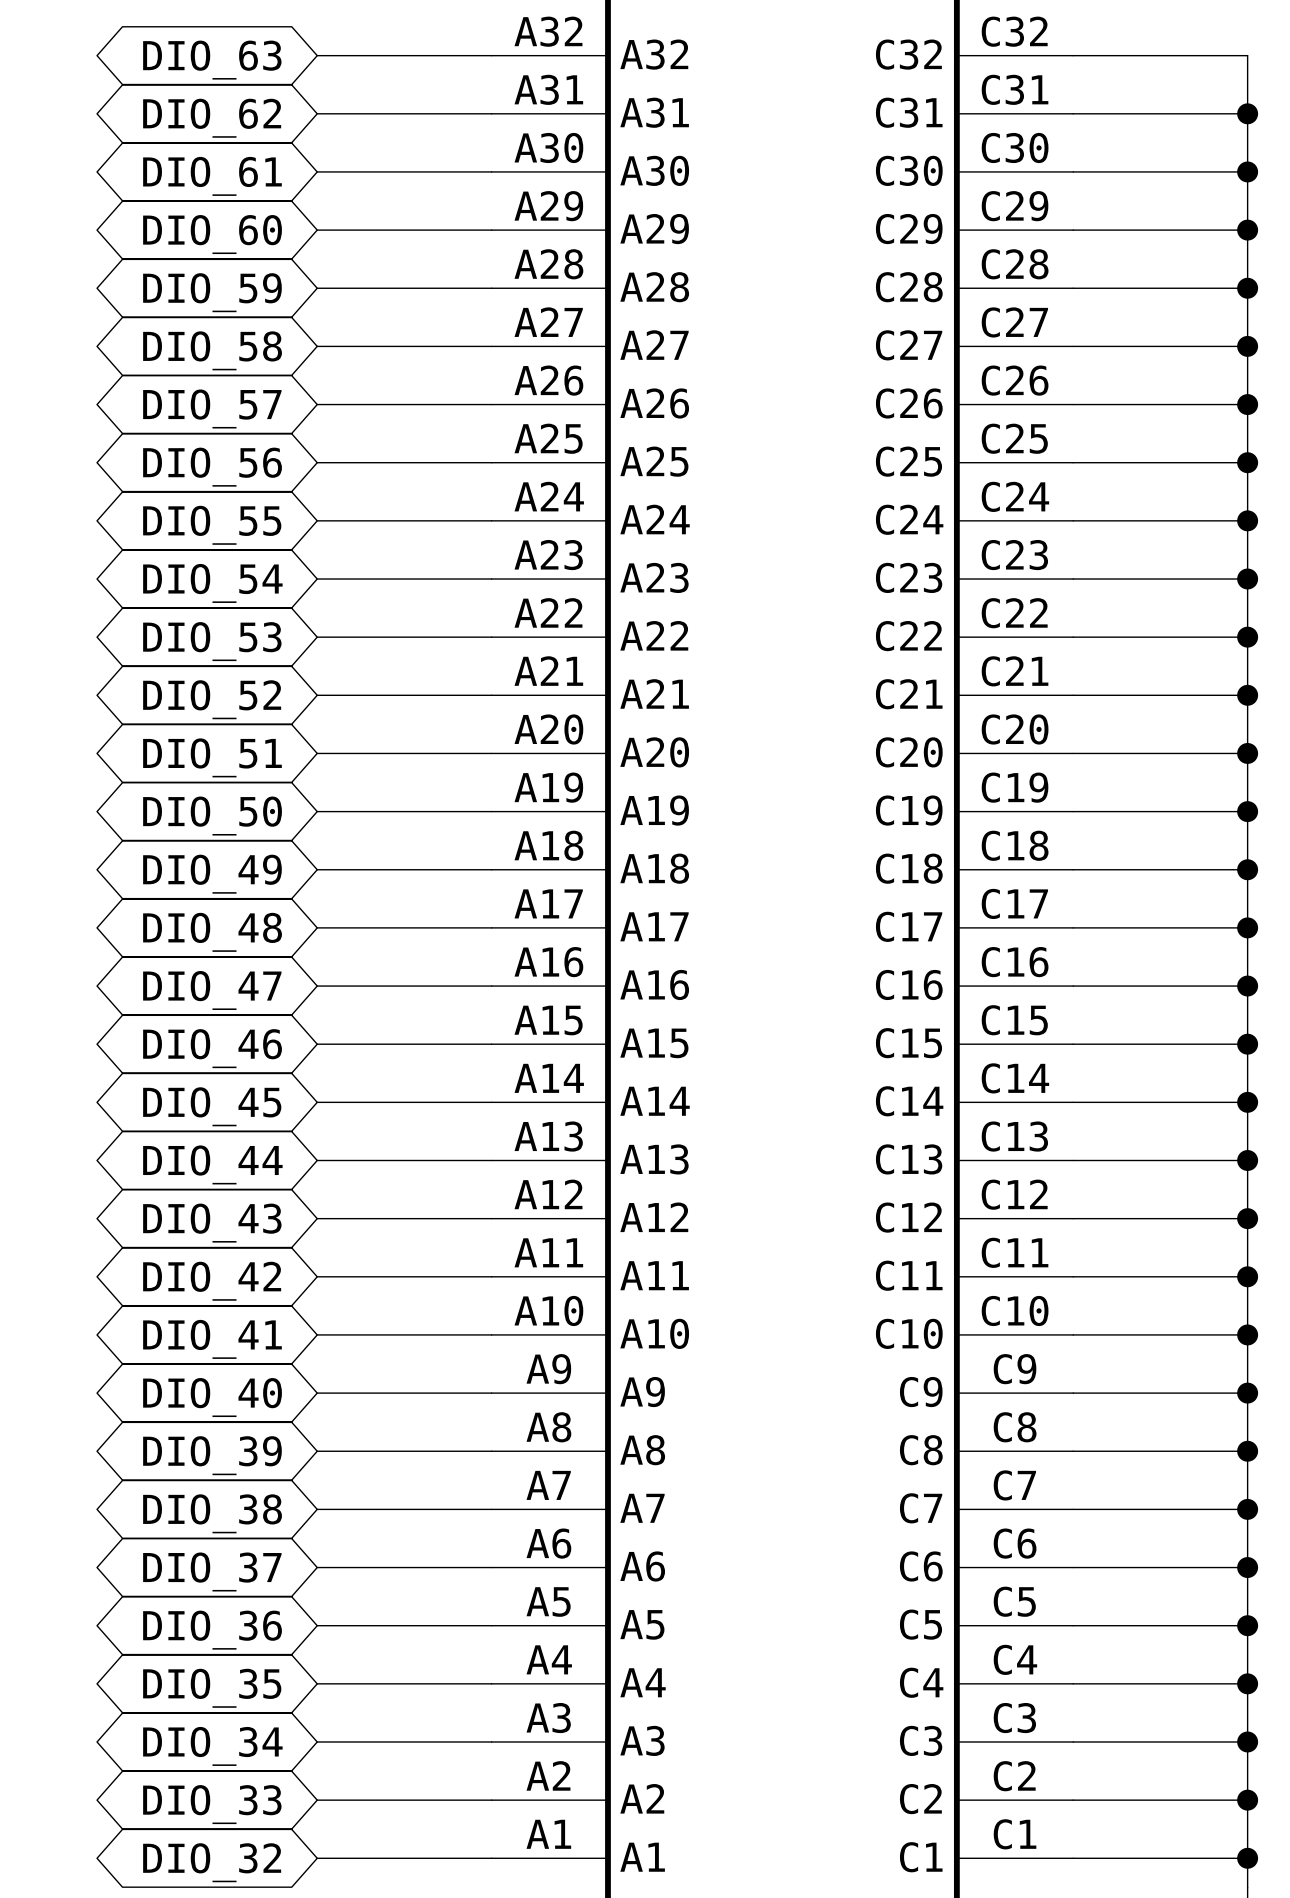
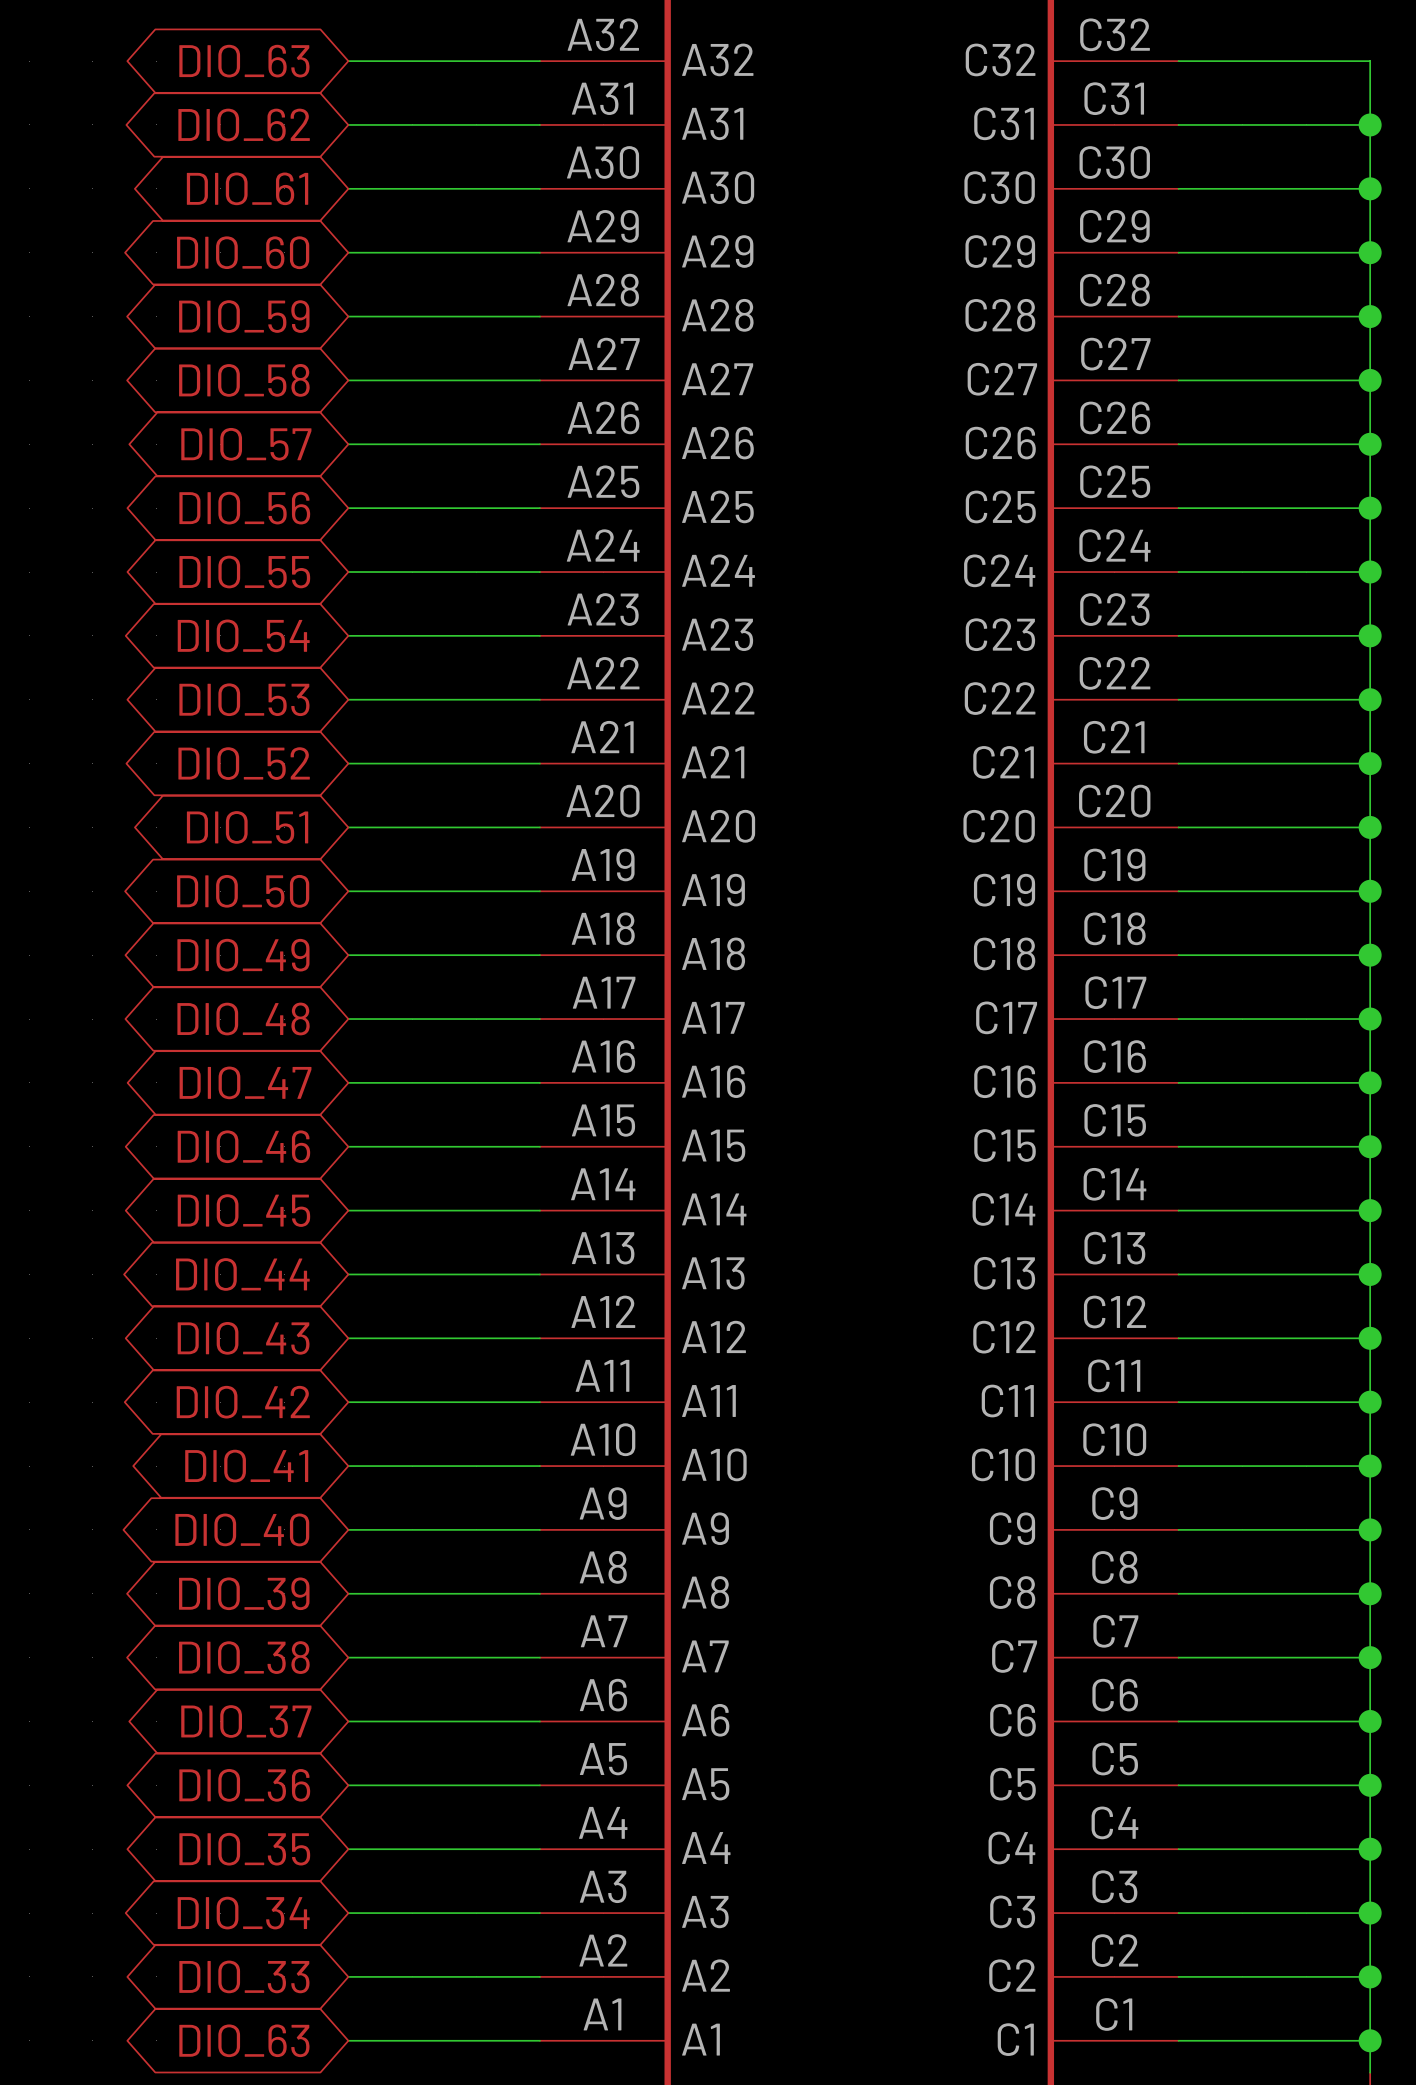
global label: DIO_32 (212, 1862) -> DIO_63 (244, 2040)

